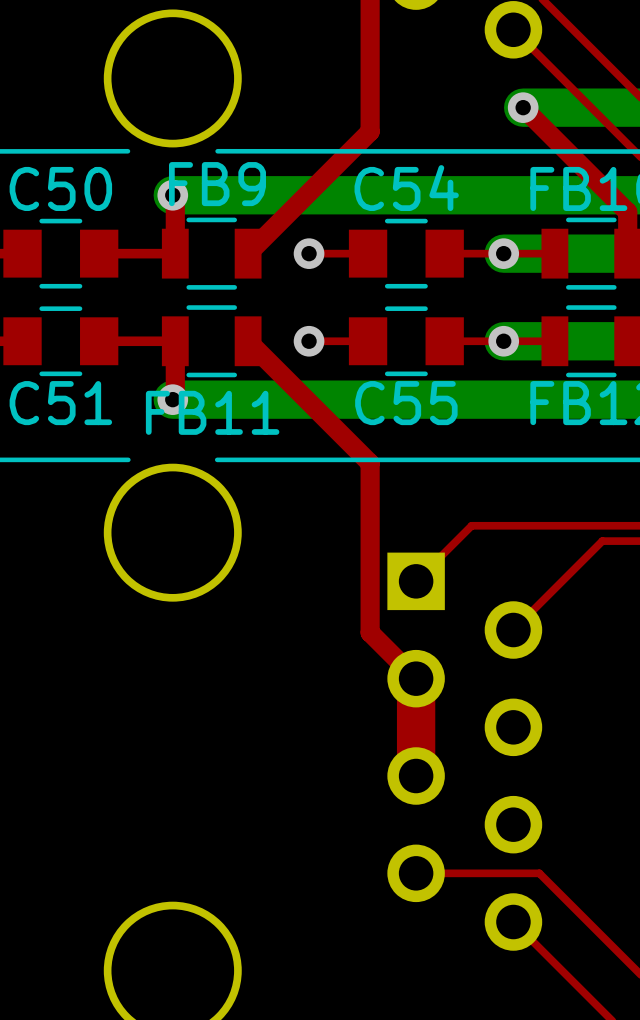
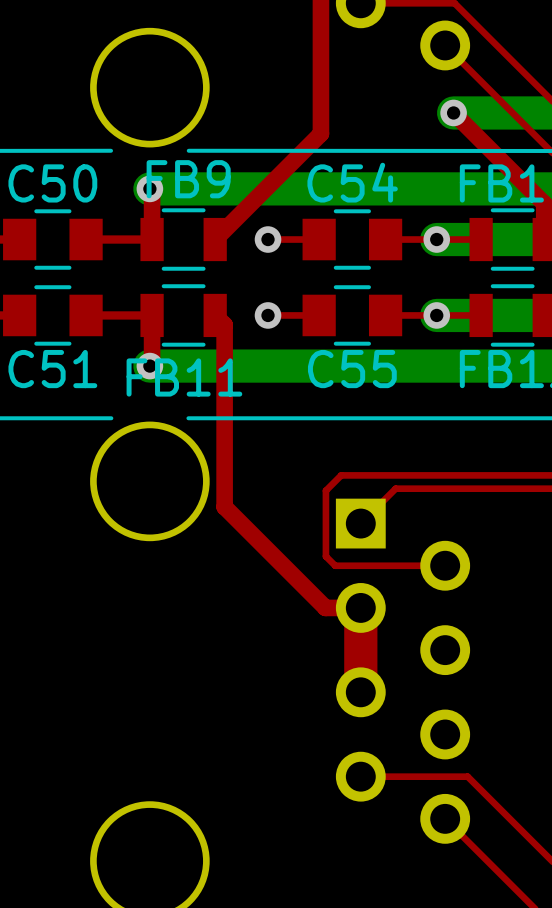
top track: (259, 352) (370, 463) (370, 632) (416, 678) -> (224, 324) (224, 506) (325, 607) (360, 607)
top track: (471, 525) (456, 541) -> (408, 475) (341, 475) (325, 490) (325, 556) (335, 565) (445, 565)
top track: (602, 541) (513, 630) -> (522, 488) (395, 488)

